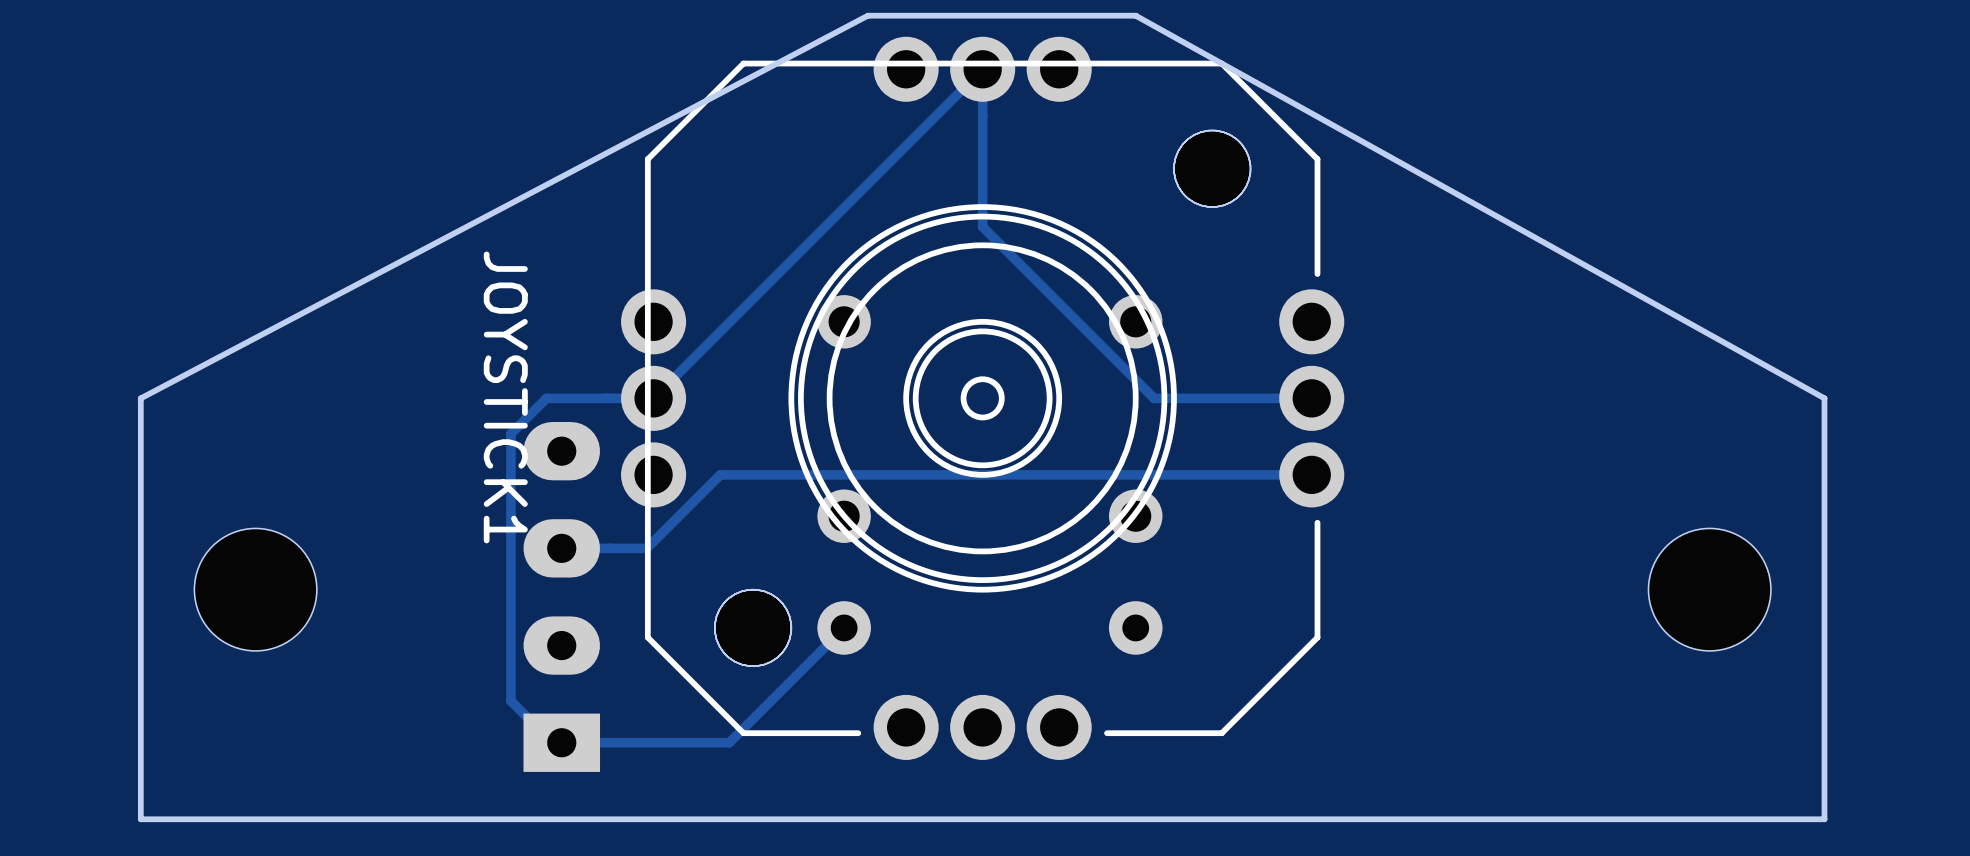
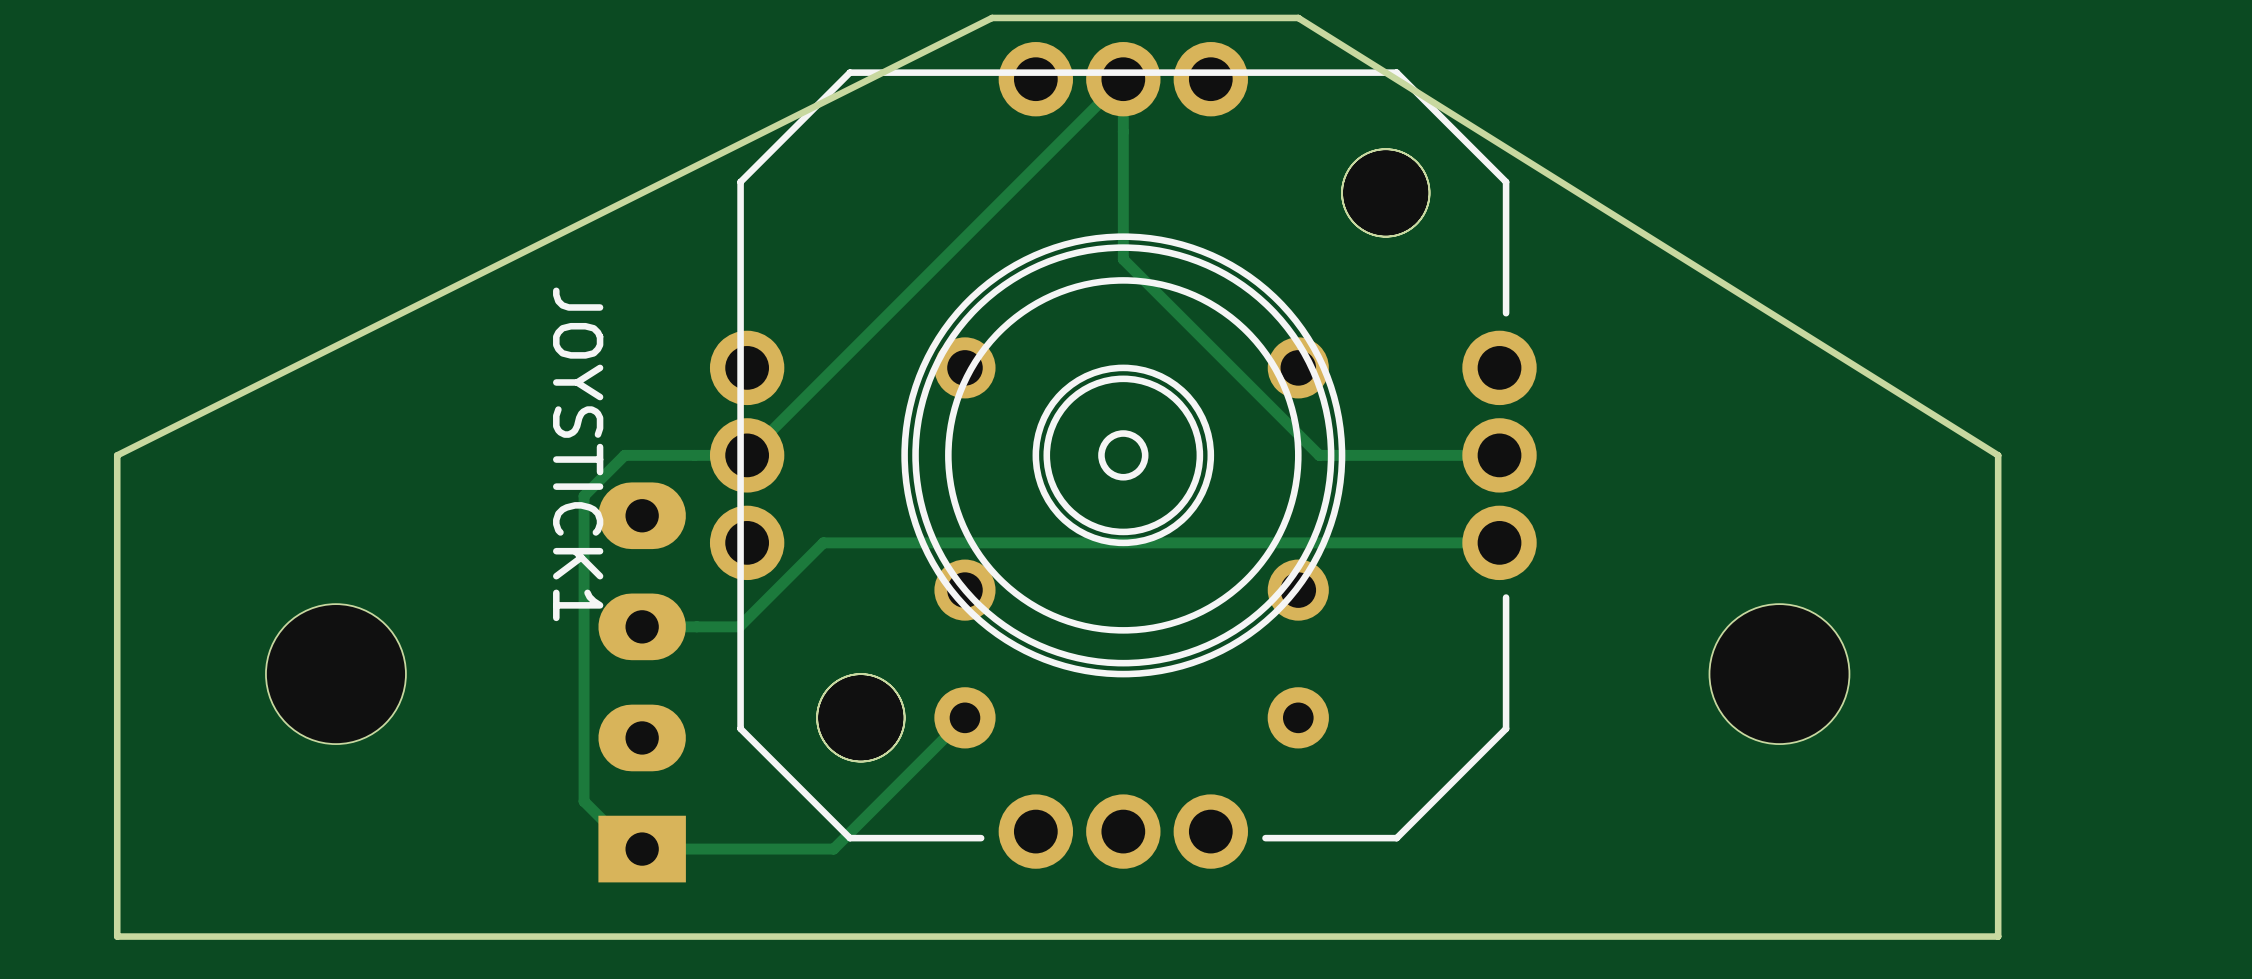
board edge: (867, 15) (140, 398) (140, 819) -> (992, 17) (117, 455) (117, 936) (160, 936)
board edge: (1135, 15) (1824, 398) (1824, 819) (1747, 819) -> (1298, 17) (1998, 455) (1998, 936)
part position: (255, 589) -> (335, 674)
part position: (1709, 589) -> (1779, 674)

